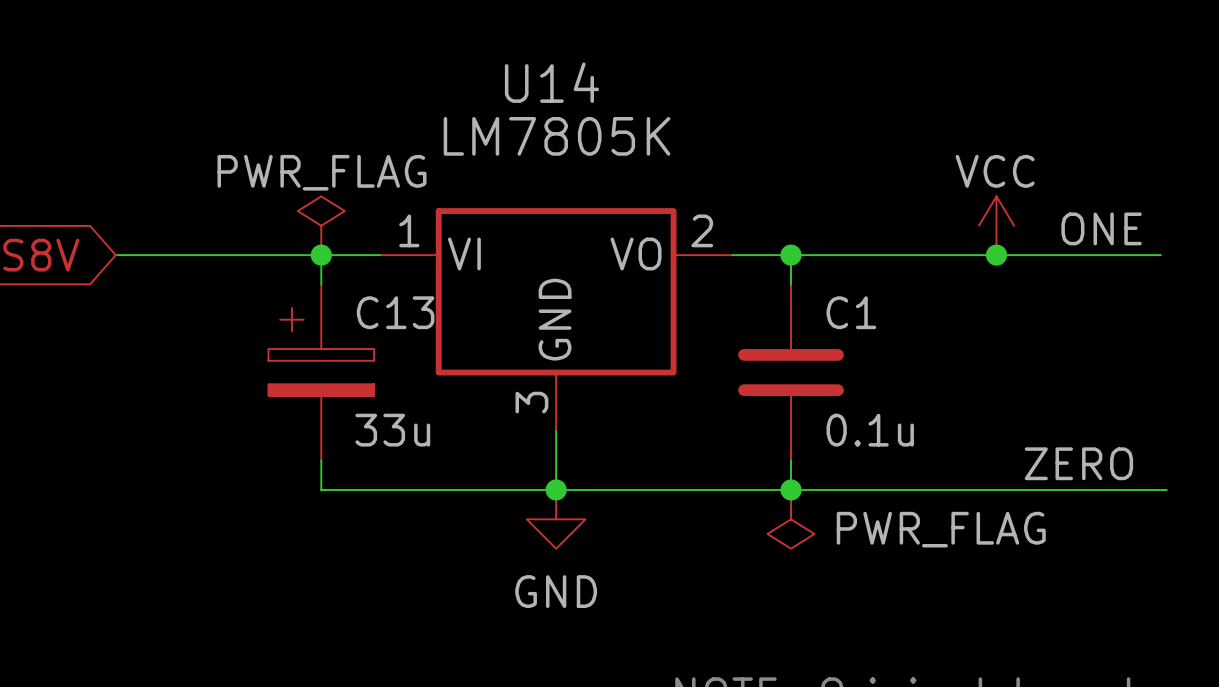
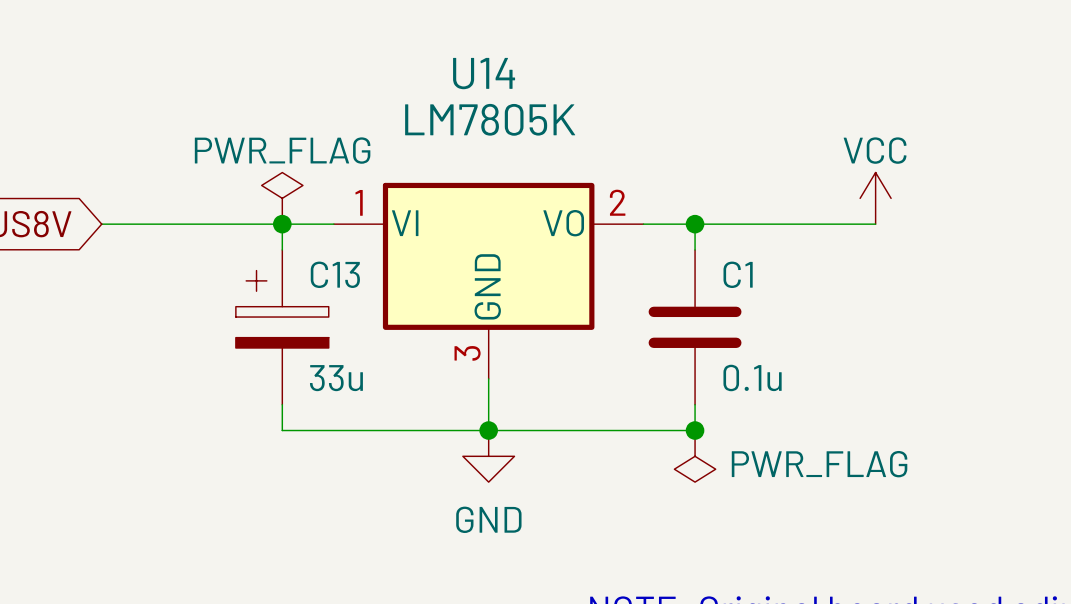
label: ONE (1101, 228) -> none
wire: (996, 255) (1160, 255) -> none
junction: (996, 255) -> none
label: ZERO (1078, 463) -> none
wire: (791, 489) (1166, 489) -> none

